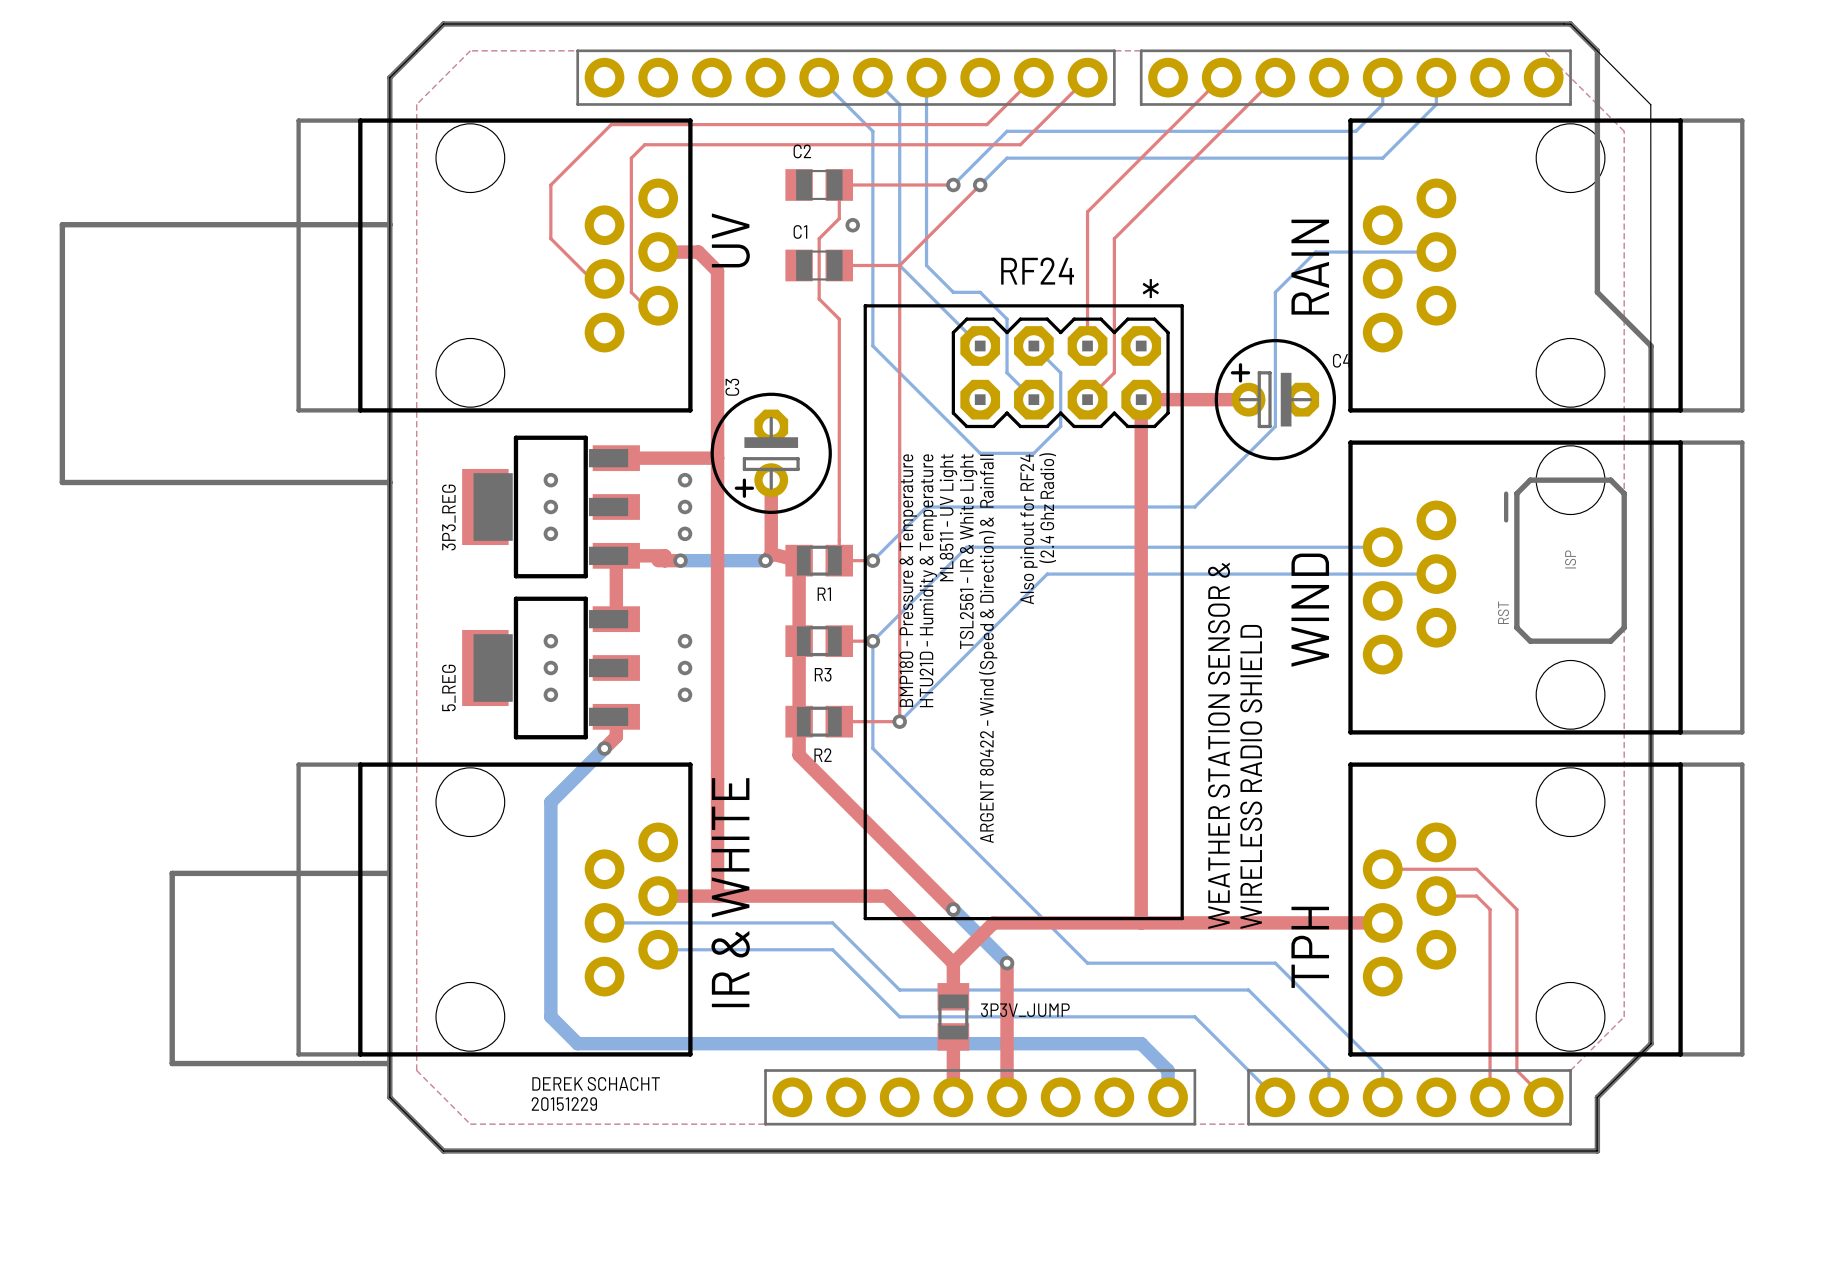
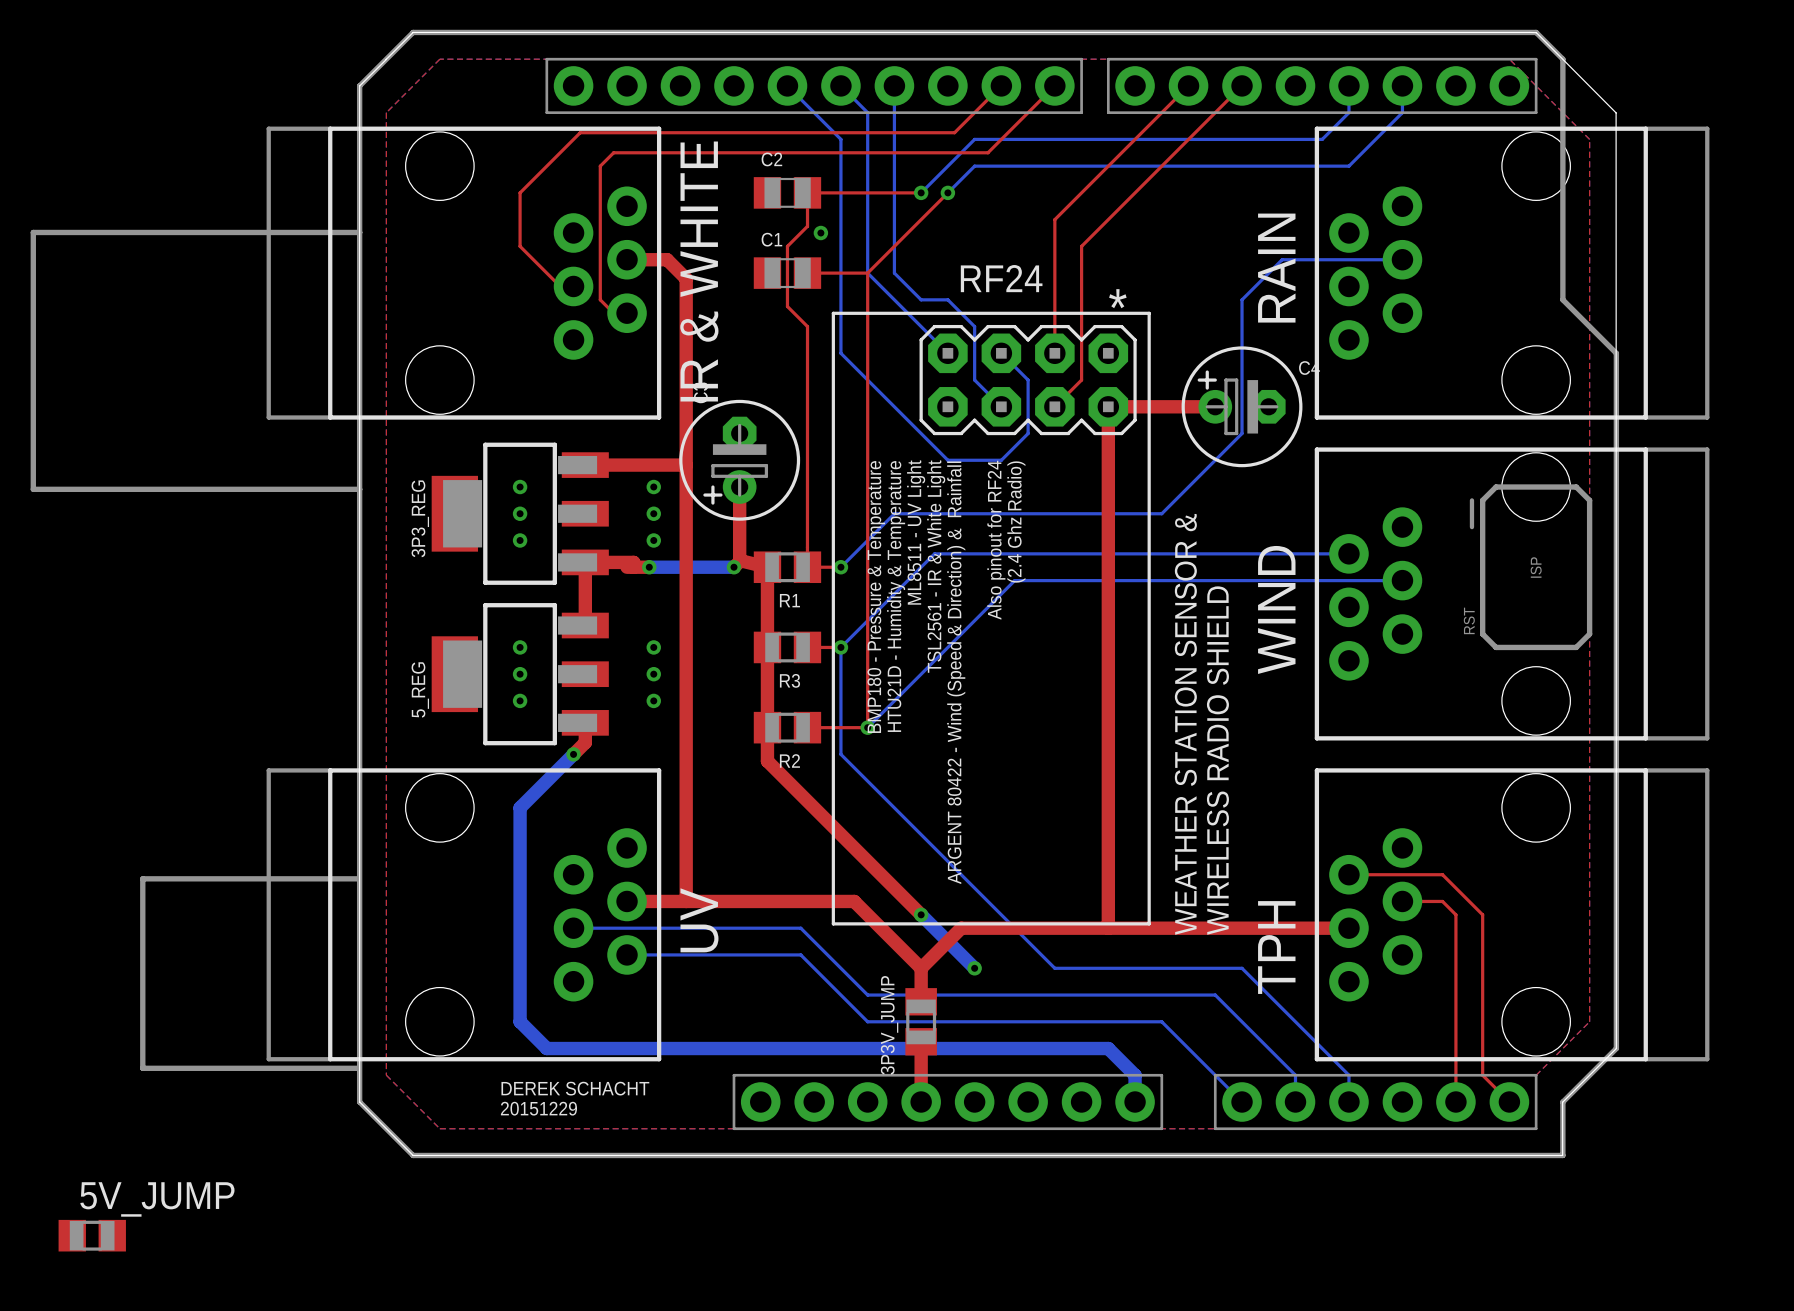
text: UV (730, 240) -> none
text: none -> IR & WHITE (699, 271)
text: IR & WHITE (730, 892) -> none
text: none -> UV (699, 920)
top track: (1007, 963) (1007, 1097) -> none
3P3V_JUMP name rotation: 0° (1025, 1010) -> 90° counterclockwise (889, 1025)
3P3V_JUMP name position: 3P3V_JUMP (1025, 1010) -> 3P3V_JUMP (889, 1025)
5V_JUMP: none -> (92, 1235)

